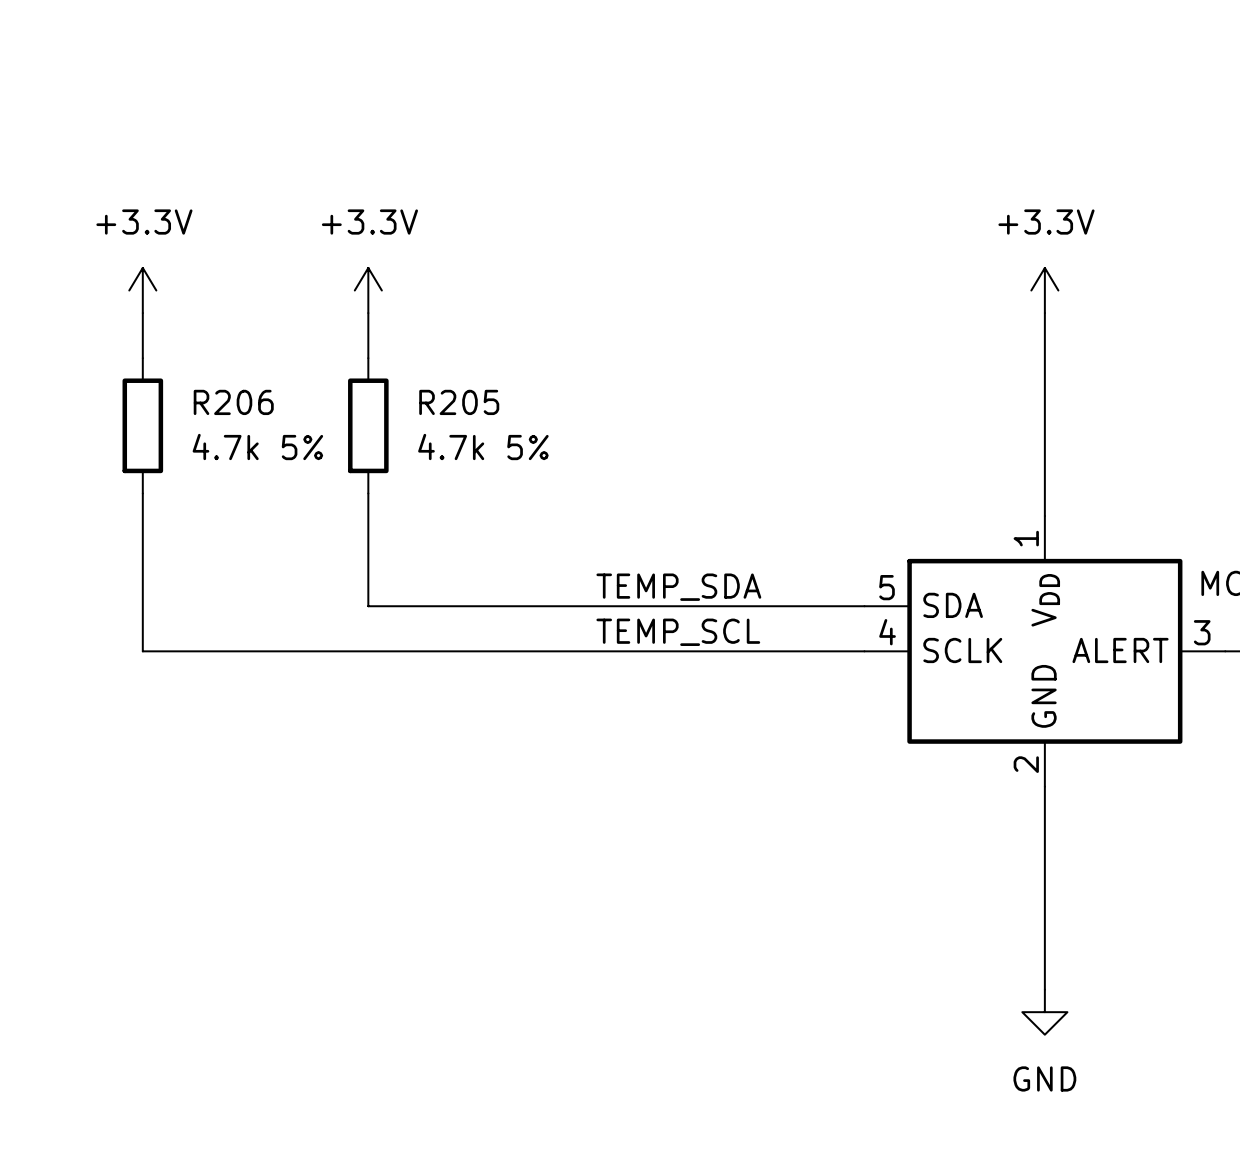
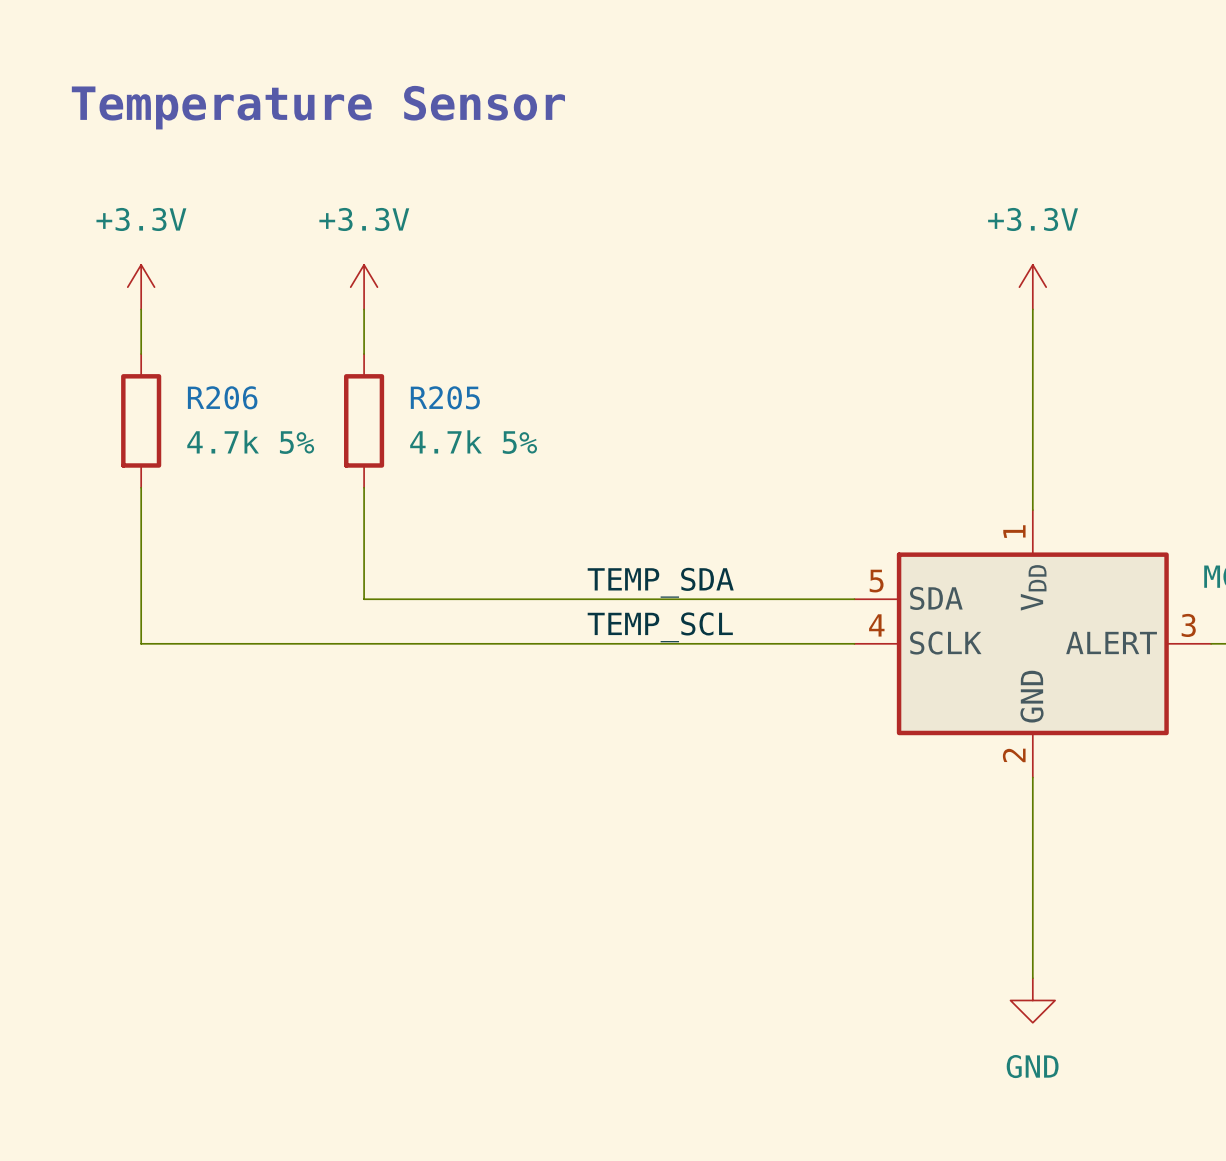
text: none -> Temperature Sensor (318, 107)

